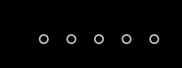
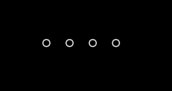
via: (154, 39) -> none

